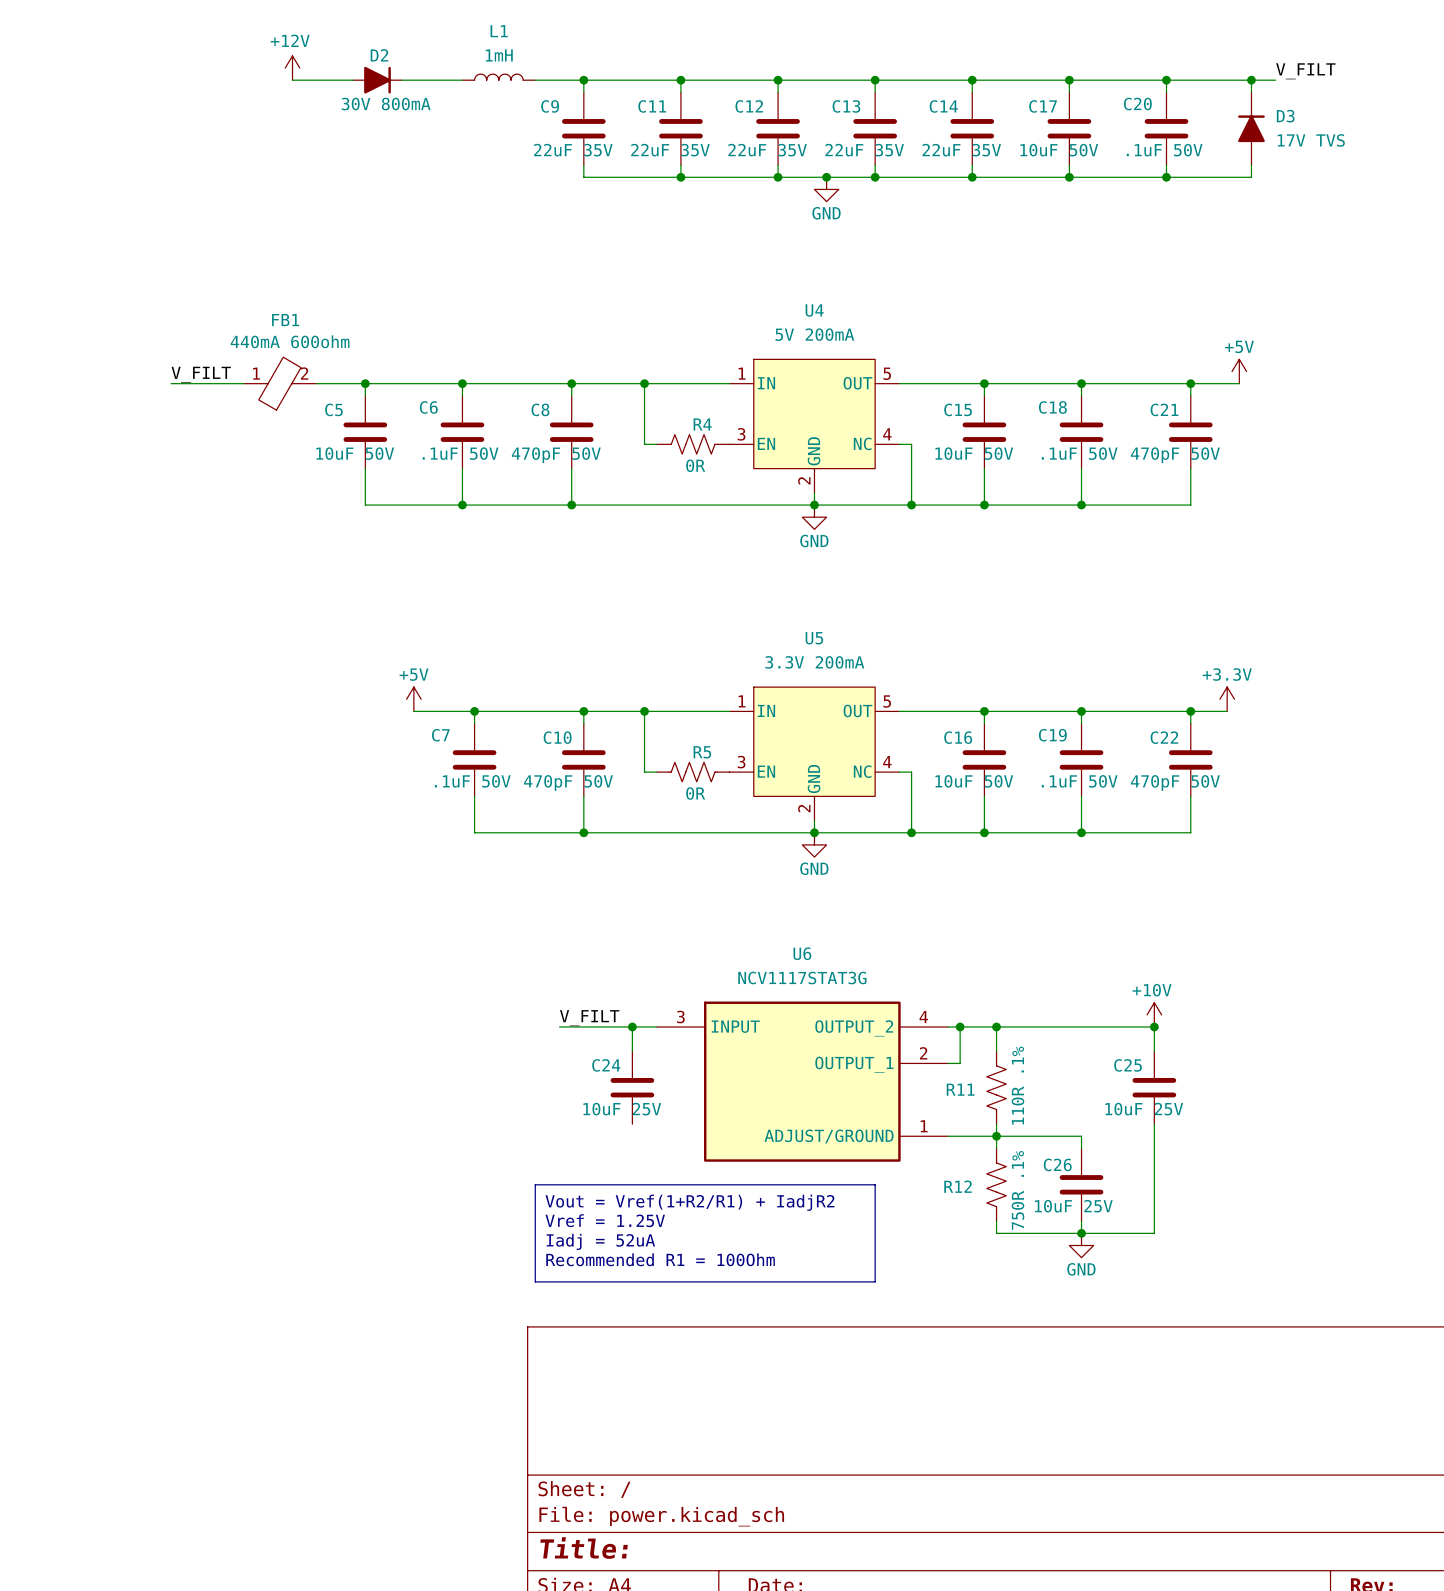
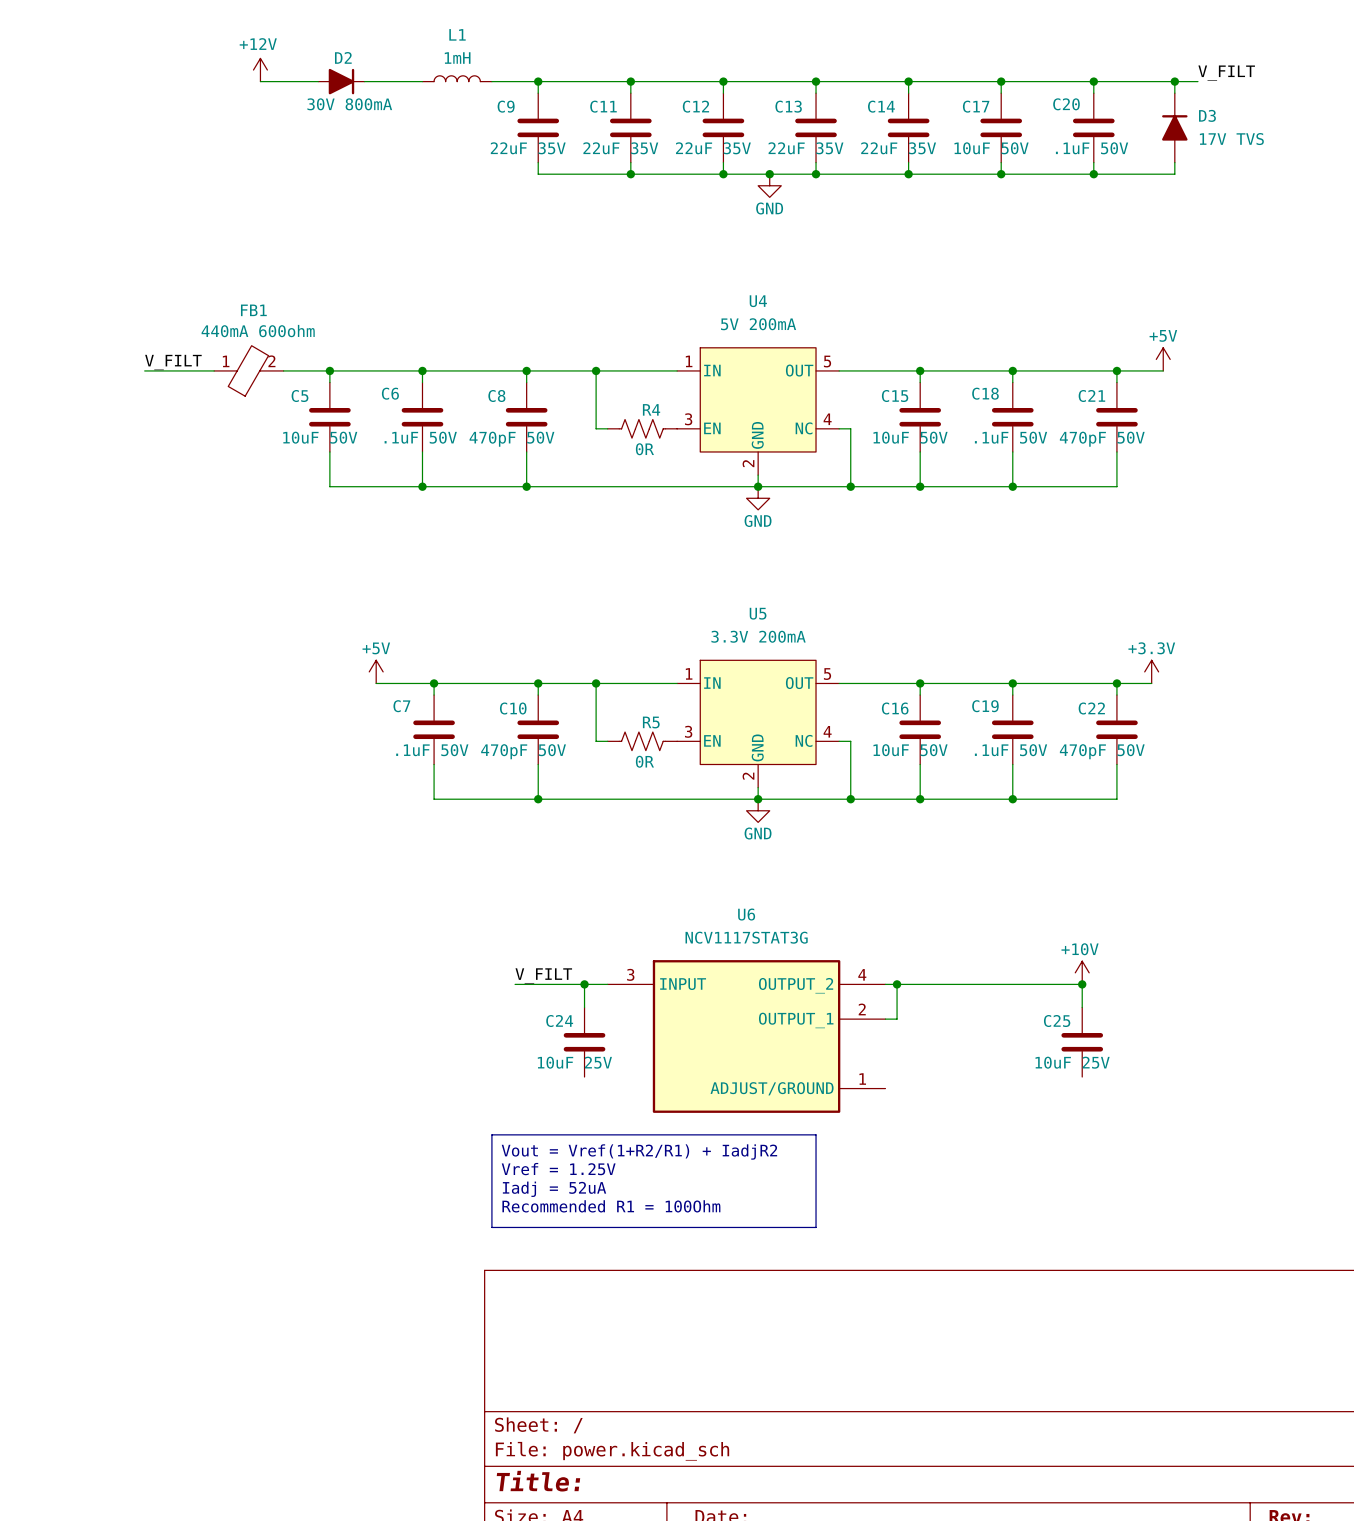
wire: (996, 1027) (996, 1051) -> none
junction: (996, 1027) -> none
R11: 110R .1% (996, 1087) -> none
wire: (996, 1124) (996, 1148) -> none
wire: (1154, 1124) (1154, 1233) (996, 1233) (996, 1221) -> none
wire: (947, 1136) (1081, 1136) (1081, 1148) -> none
junction: (996, 1136) -> none
R12: 750R .1% (996, 1184) -> none
C26: 10uF 25V (1081, 1184) -> none
wire: (1081, 1221) (1081, 1233) -> none
junction: (1081, 1233) -> none
power symbol: GND (1081, 1245) -> none

